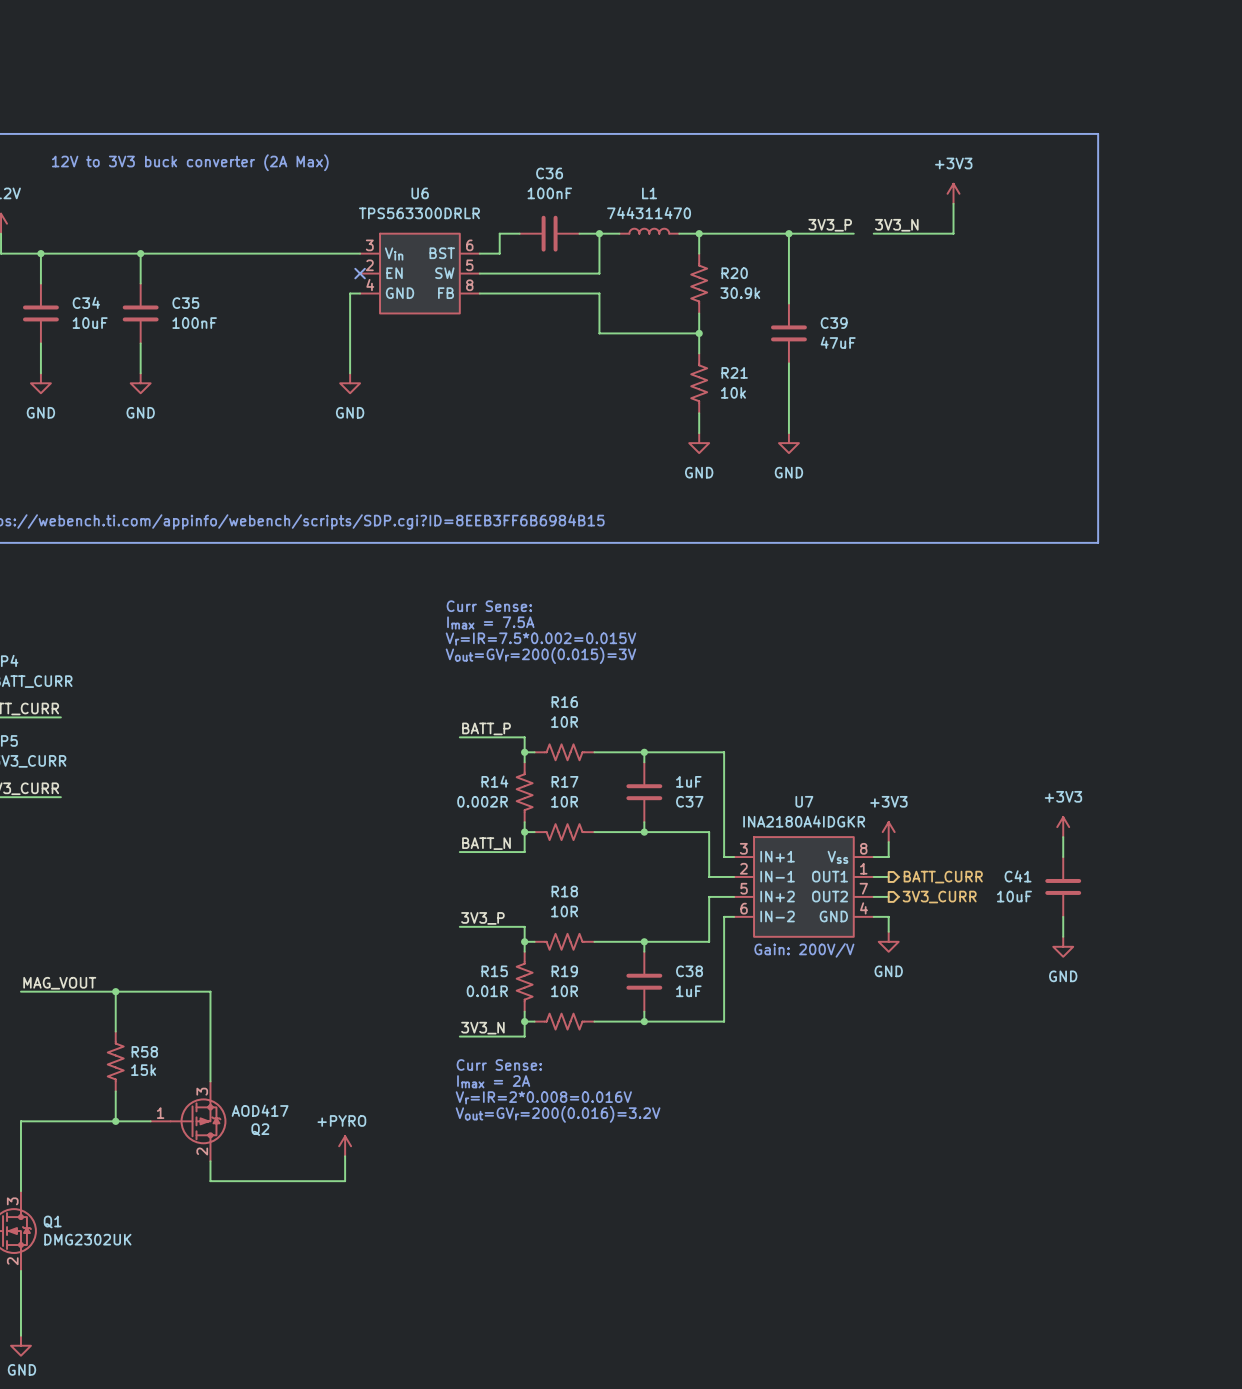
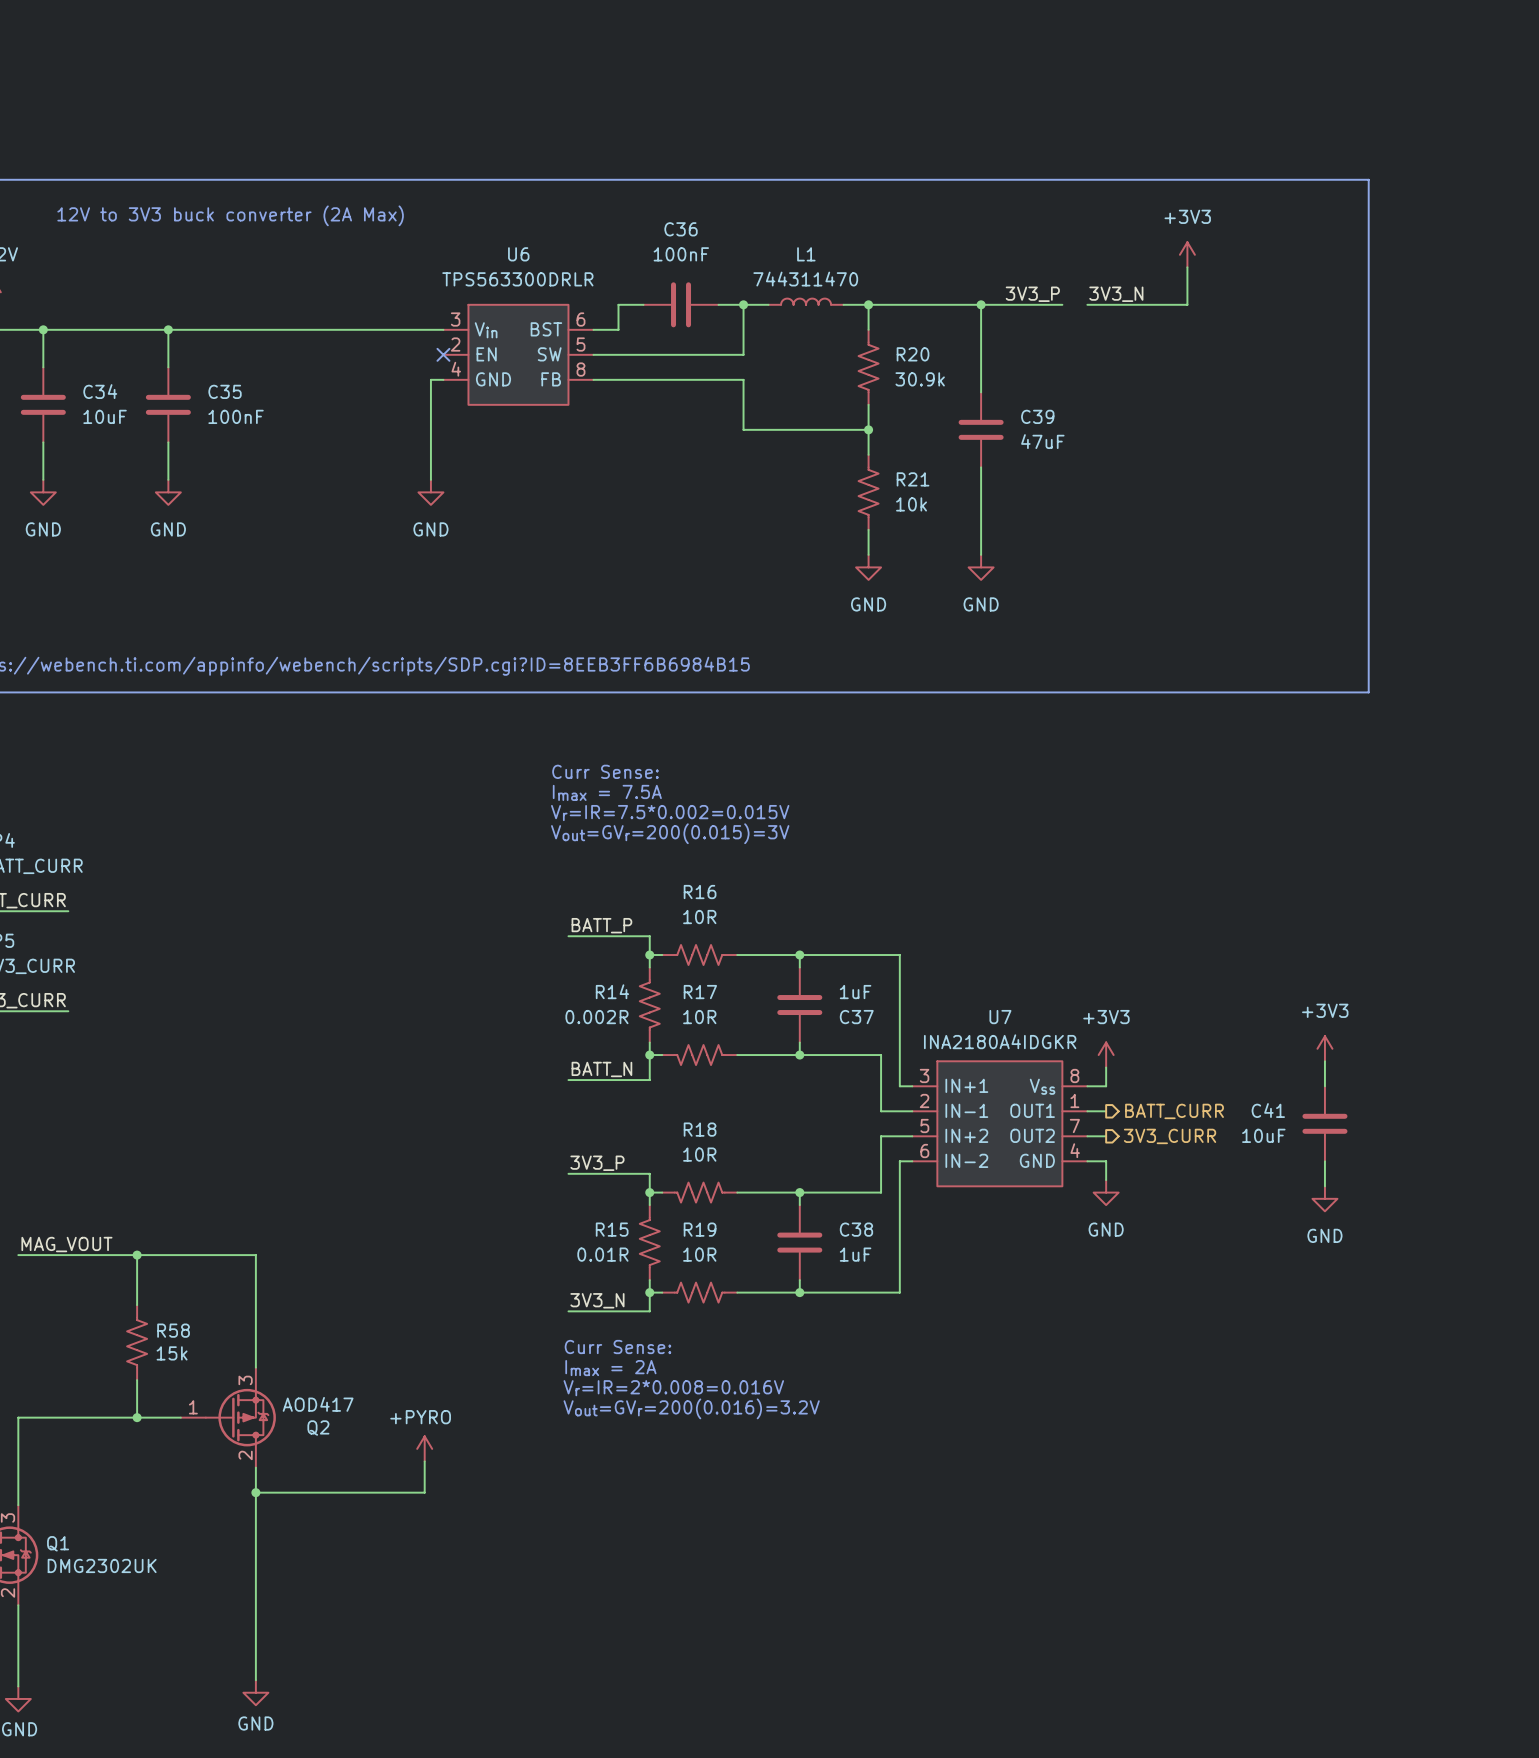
text: Gain: 200V/V (804, 950) -> none
wire: none -> (255, 1492) (255, 1680)
junction: none -> (255, 1492)
power symbol: none -> GND (255, 1692)

